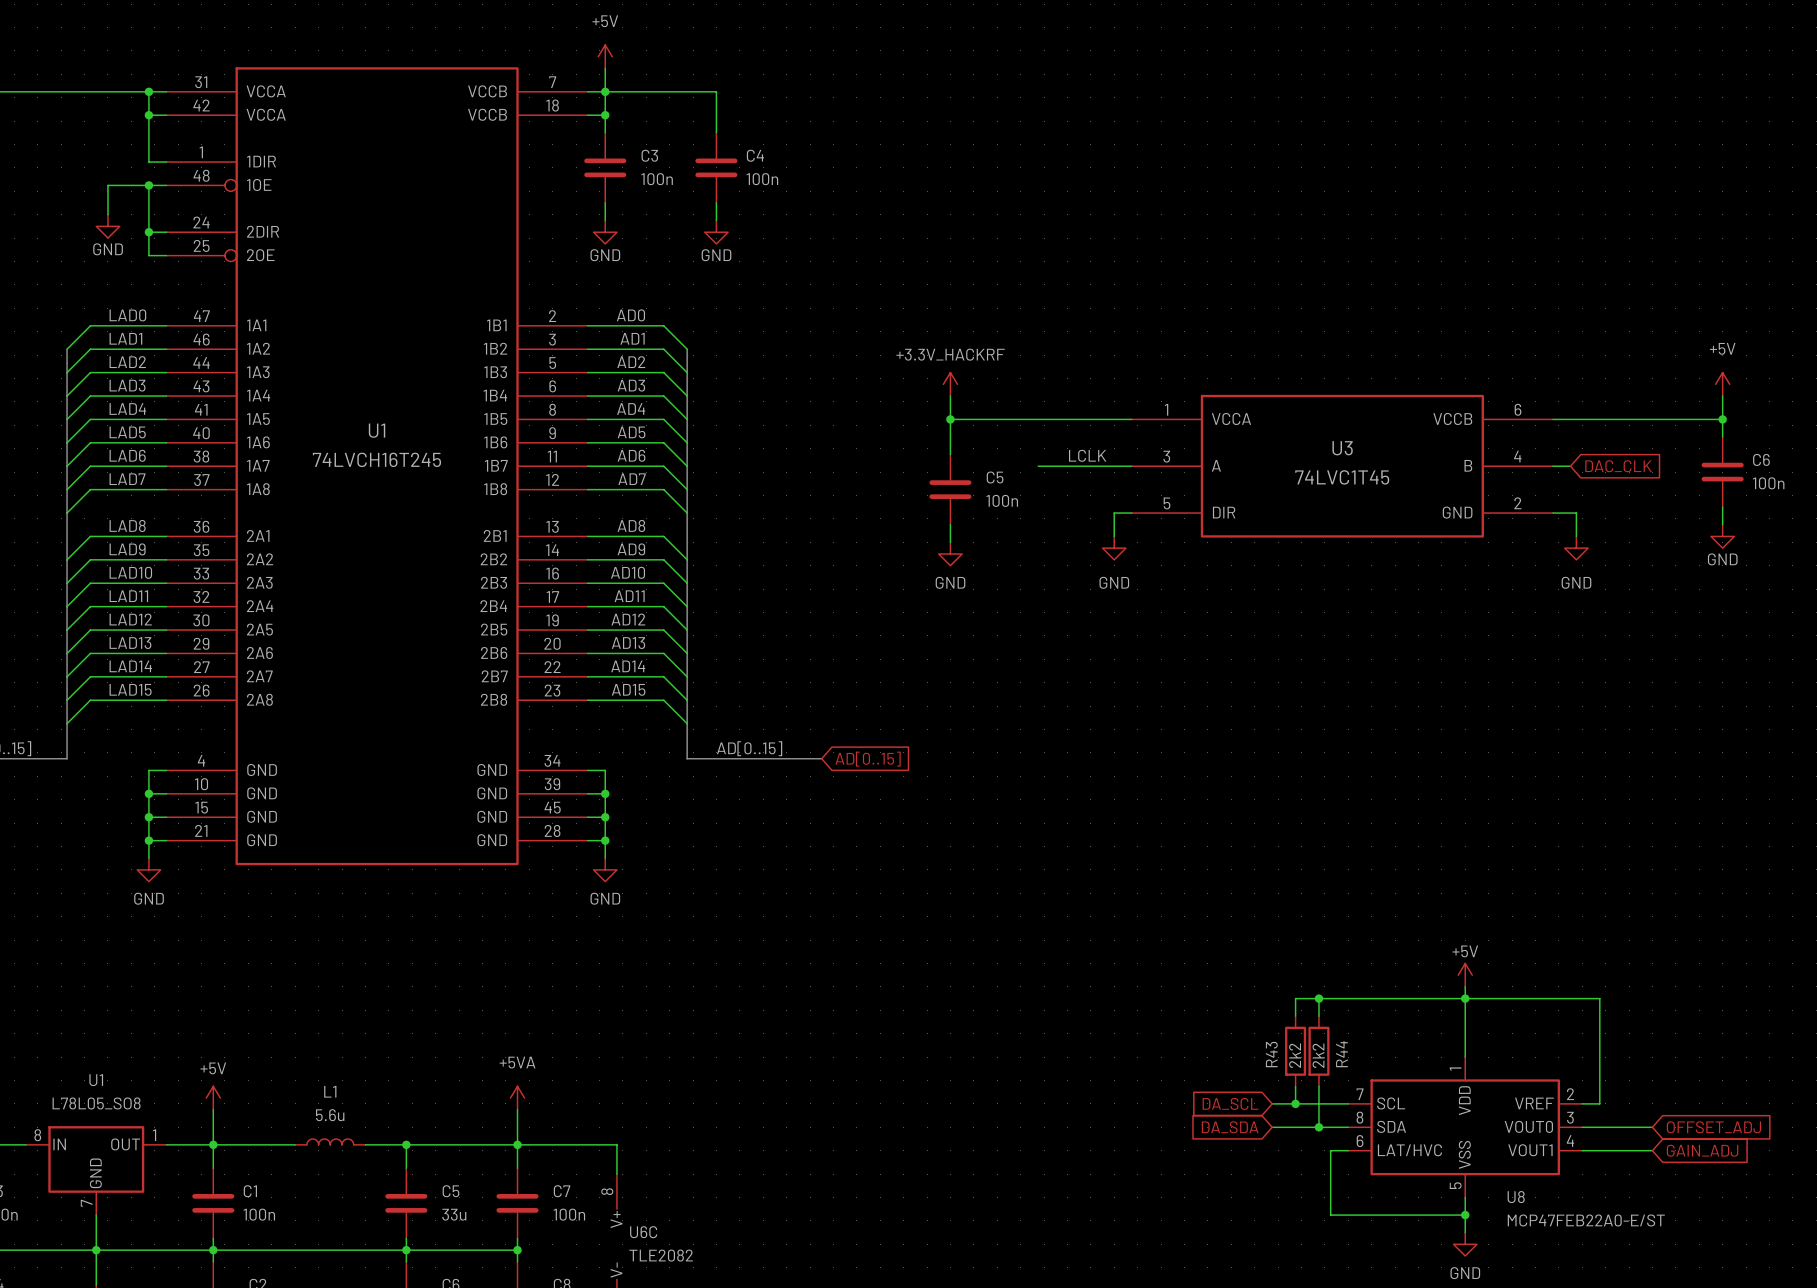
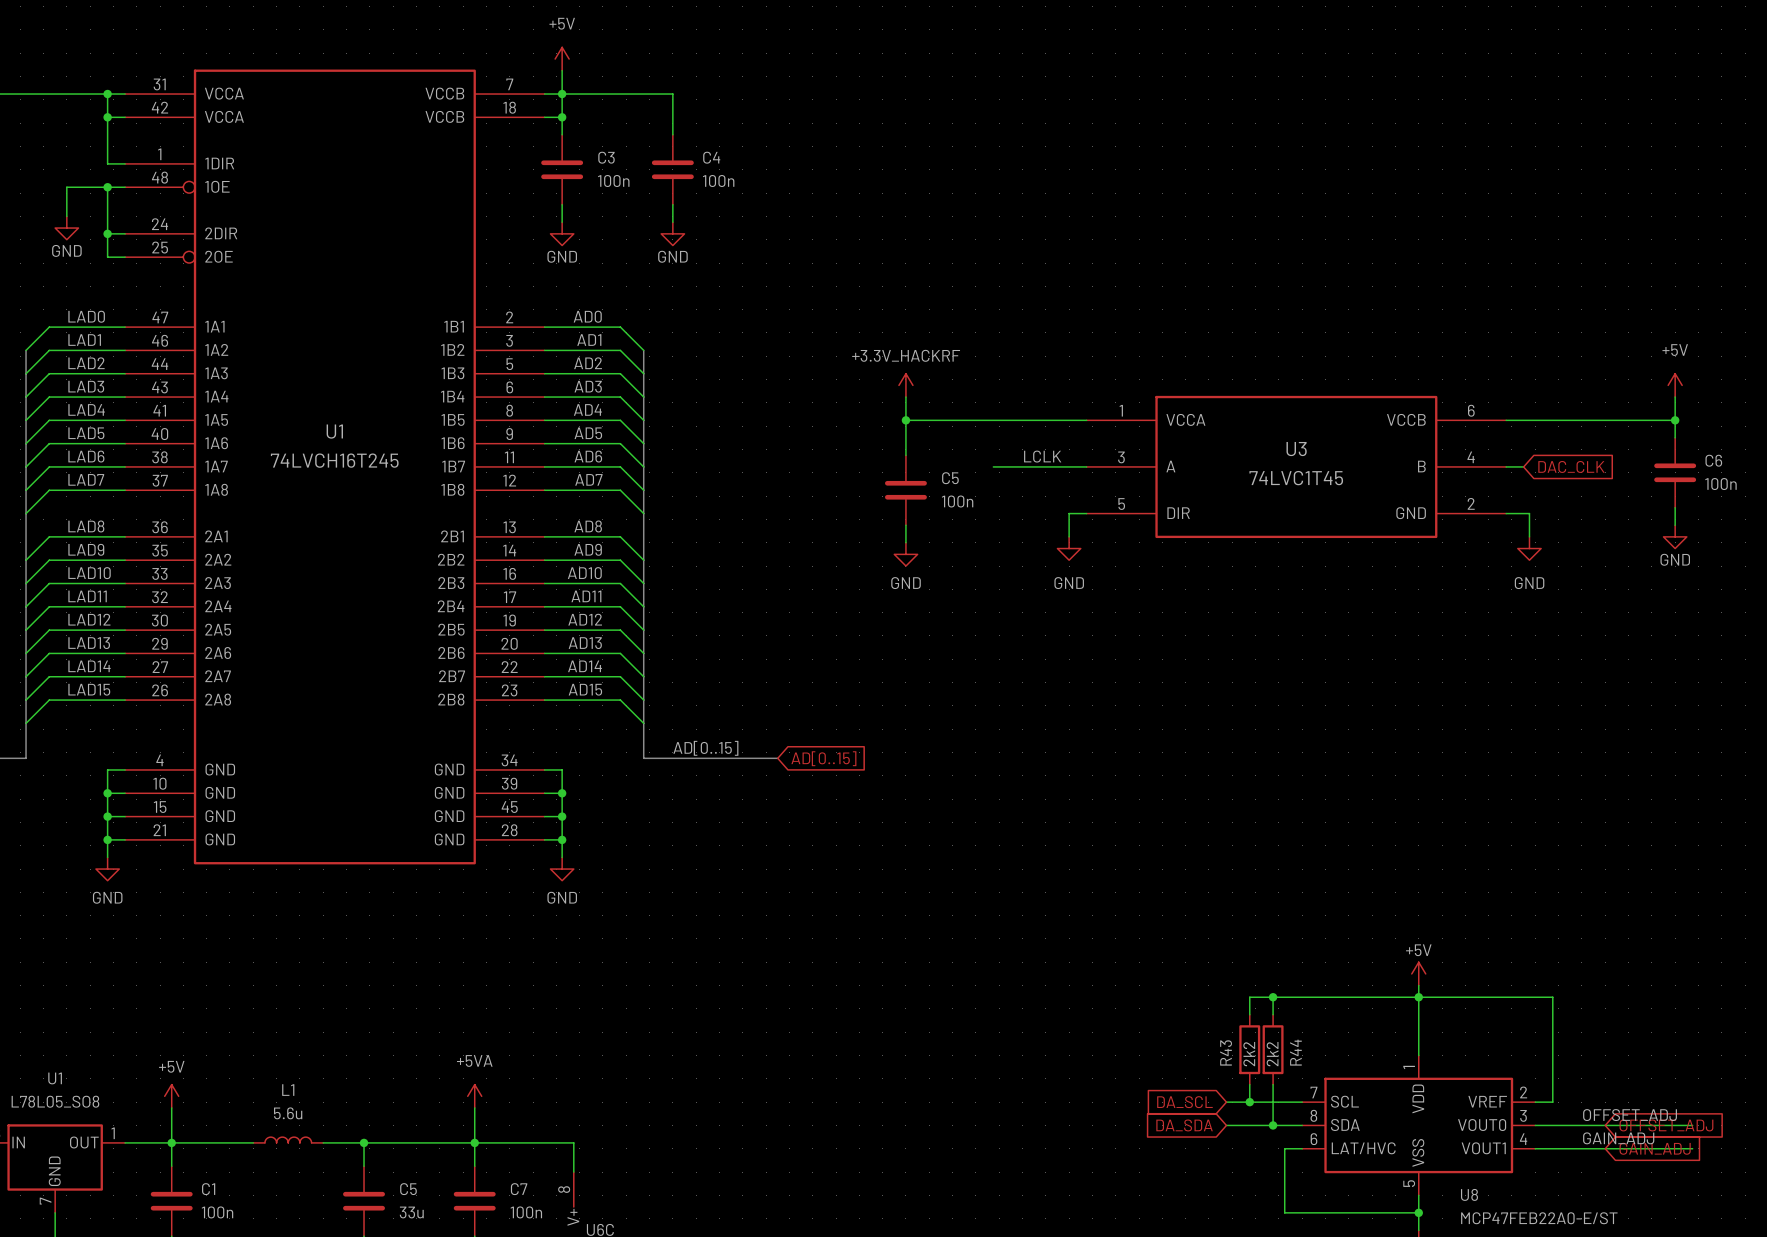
label: none -> OFFSET_ADJ (1630, 1115)
wire: none -> (1605, 1125) (1692, 1125)
label: none -> GAIN_ADJ (1618, 1138)
wire: none -> (1605, 1148) (1692, 1148)

